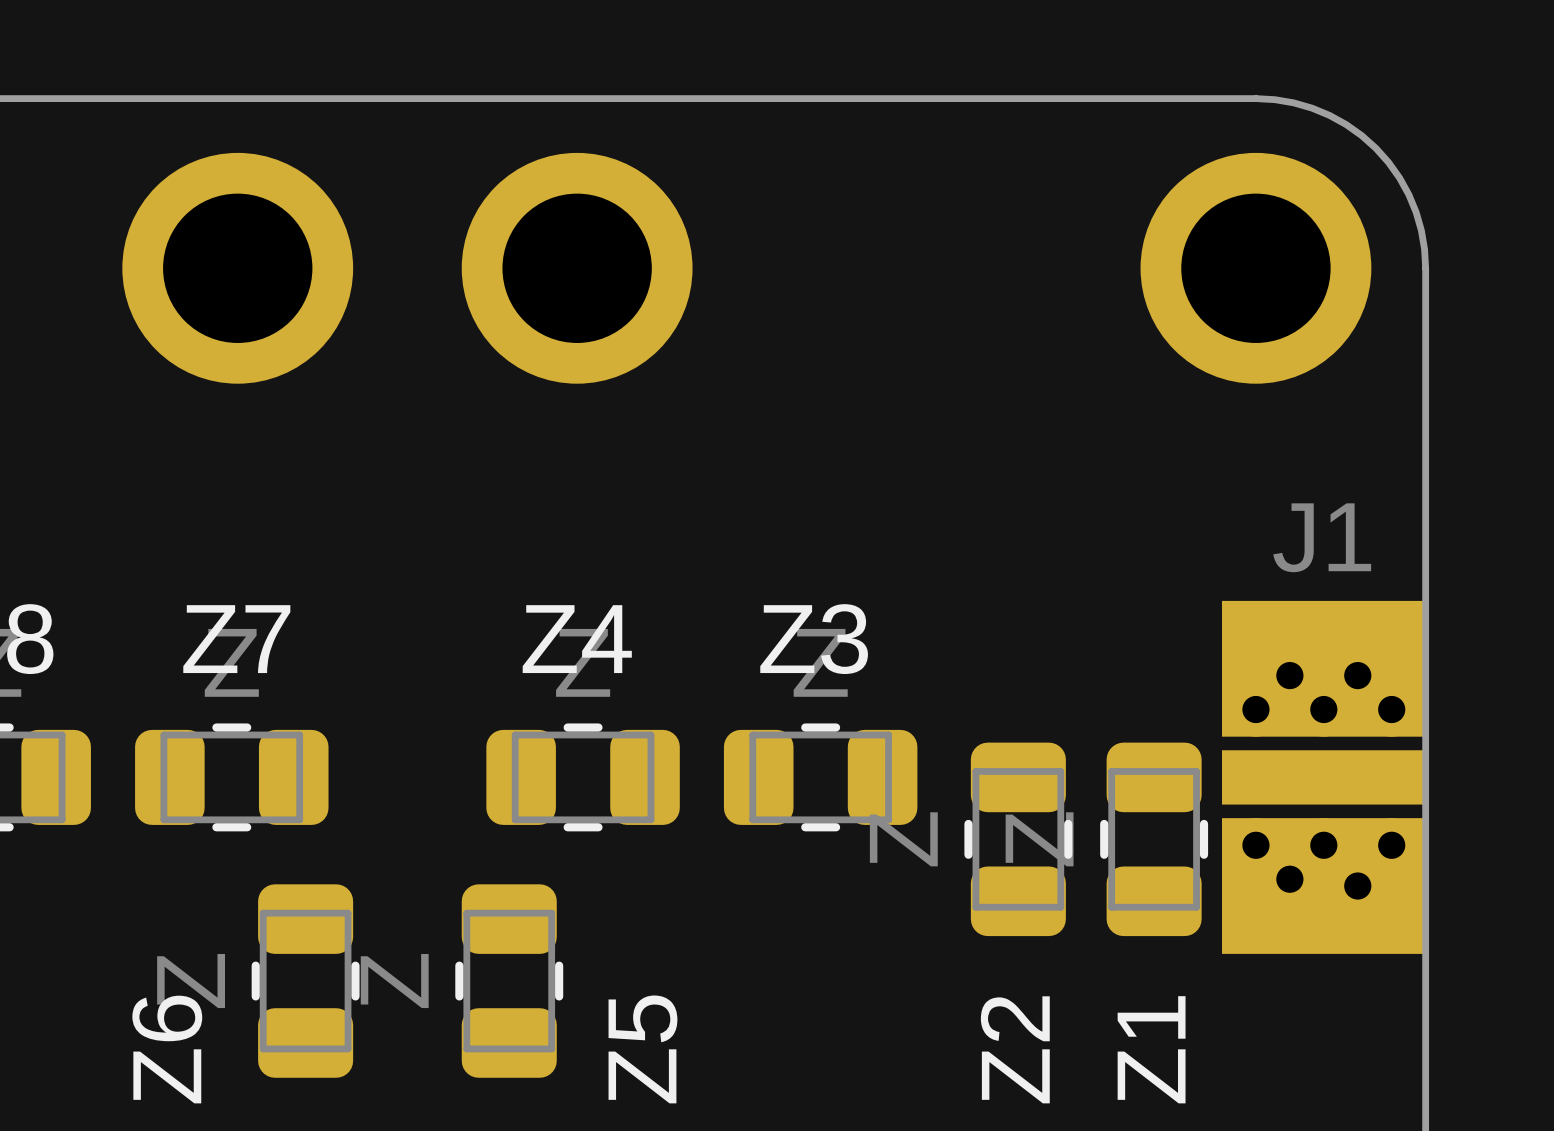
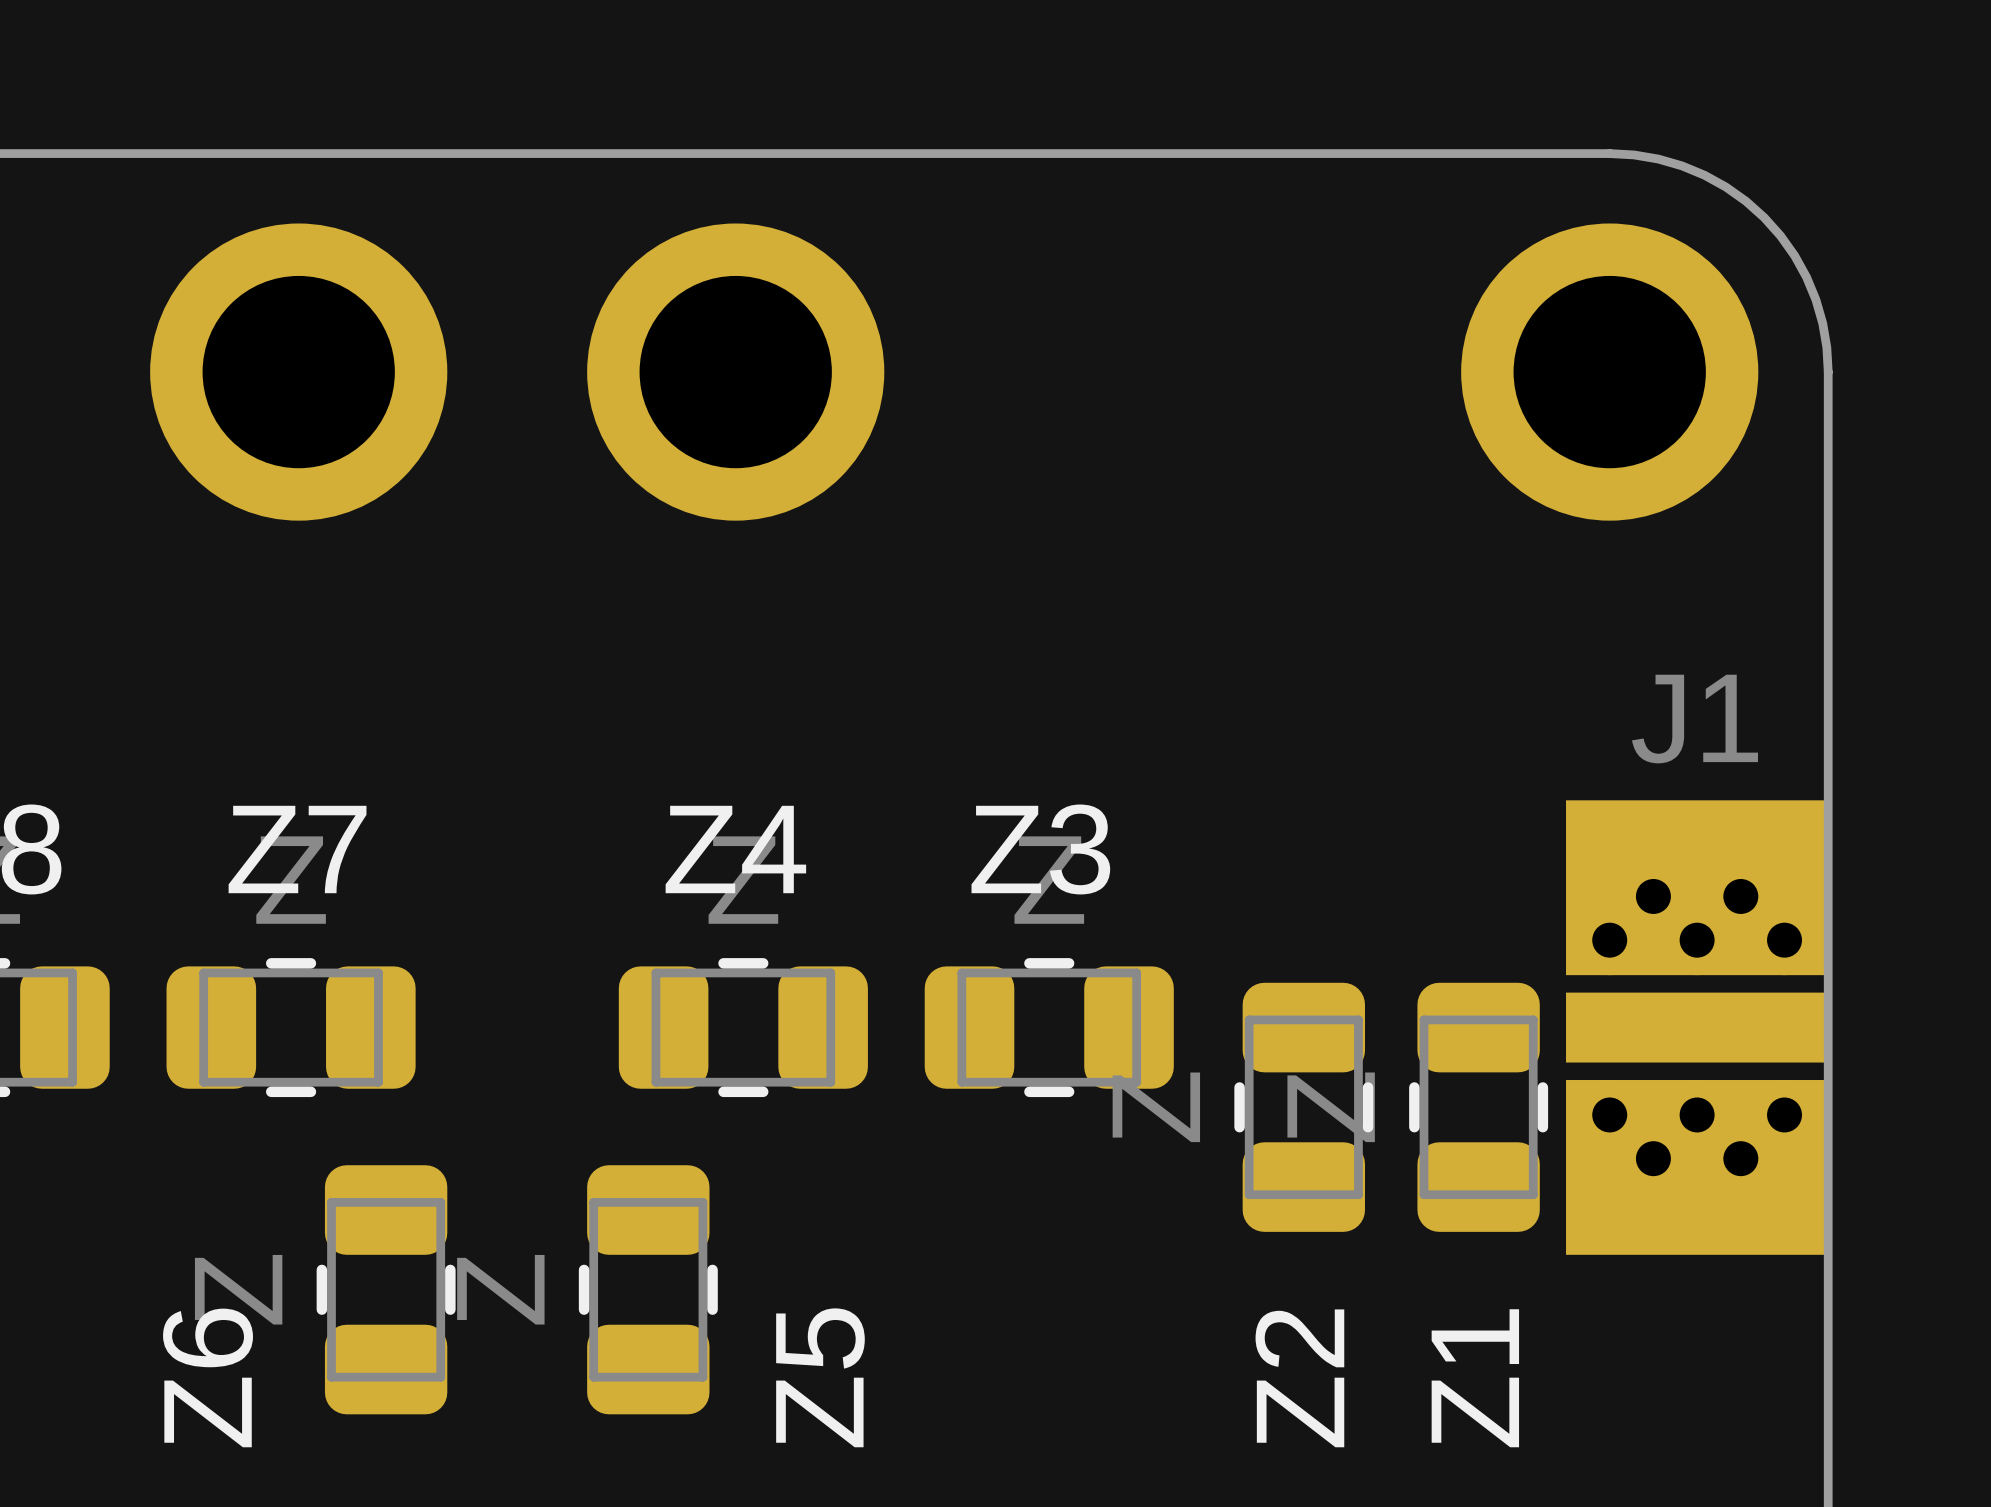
J1 footprint: [1222, 600, 1426, 954] -> [1566, 800, 1829, 1255]

